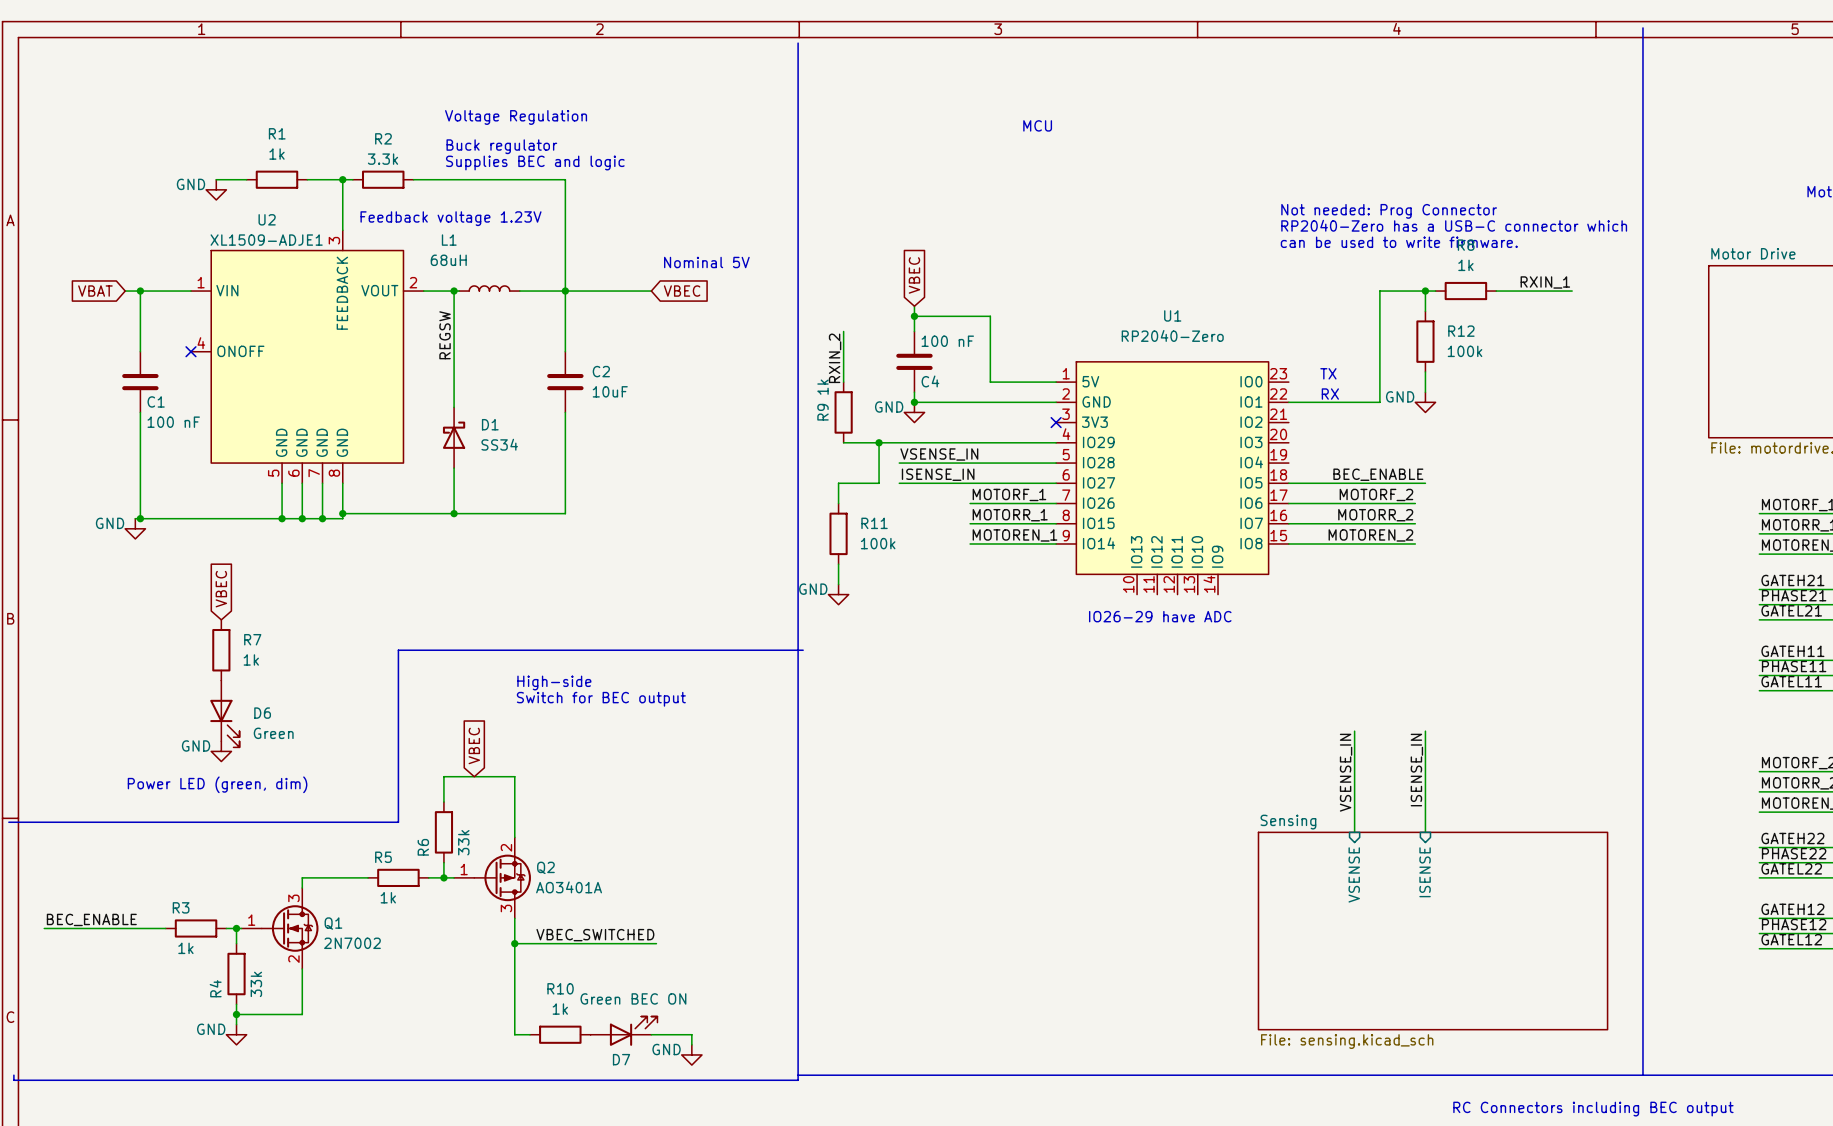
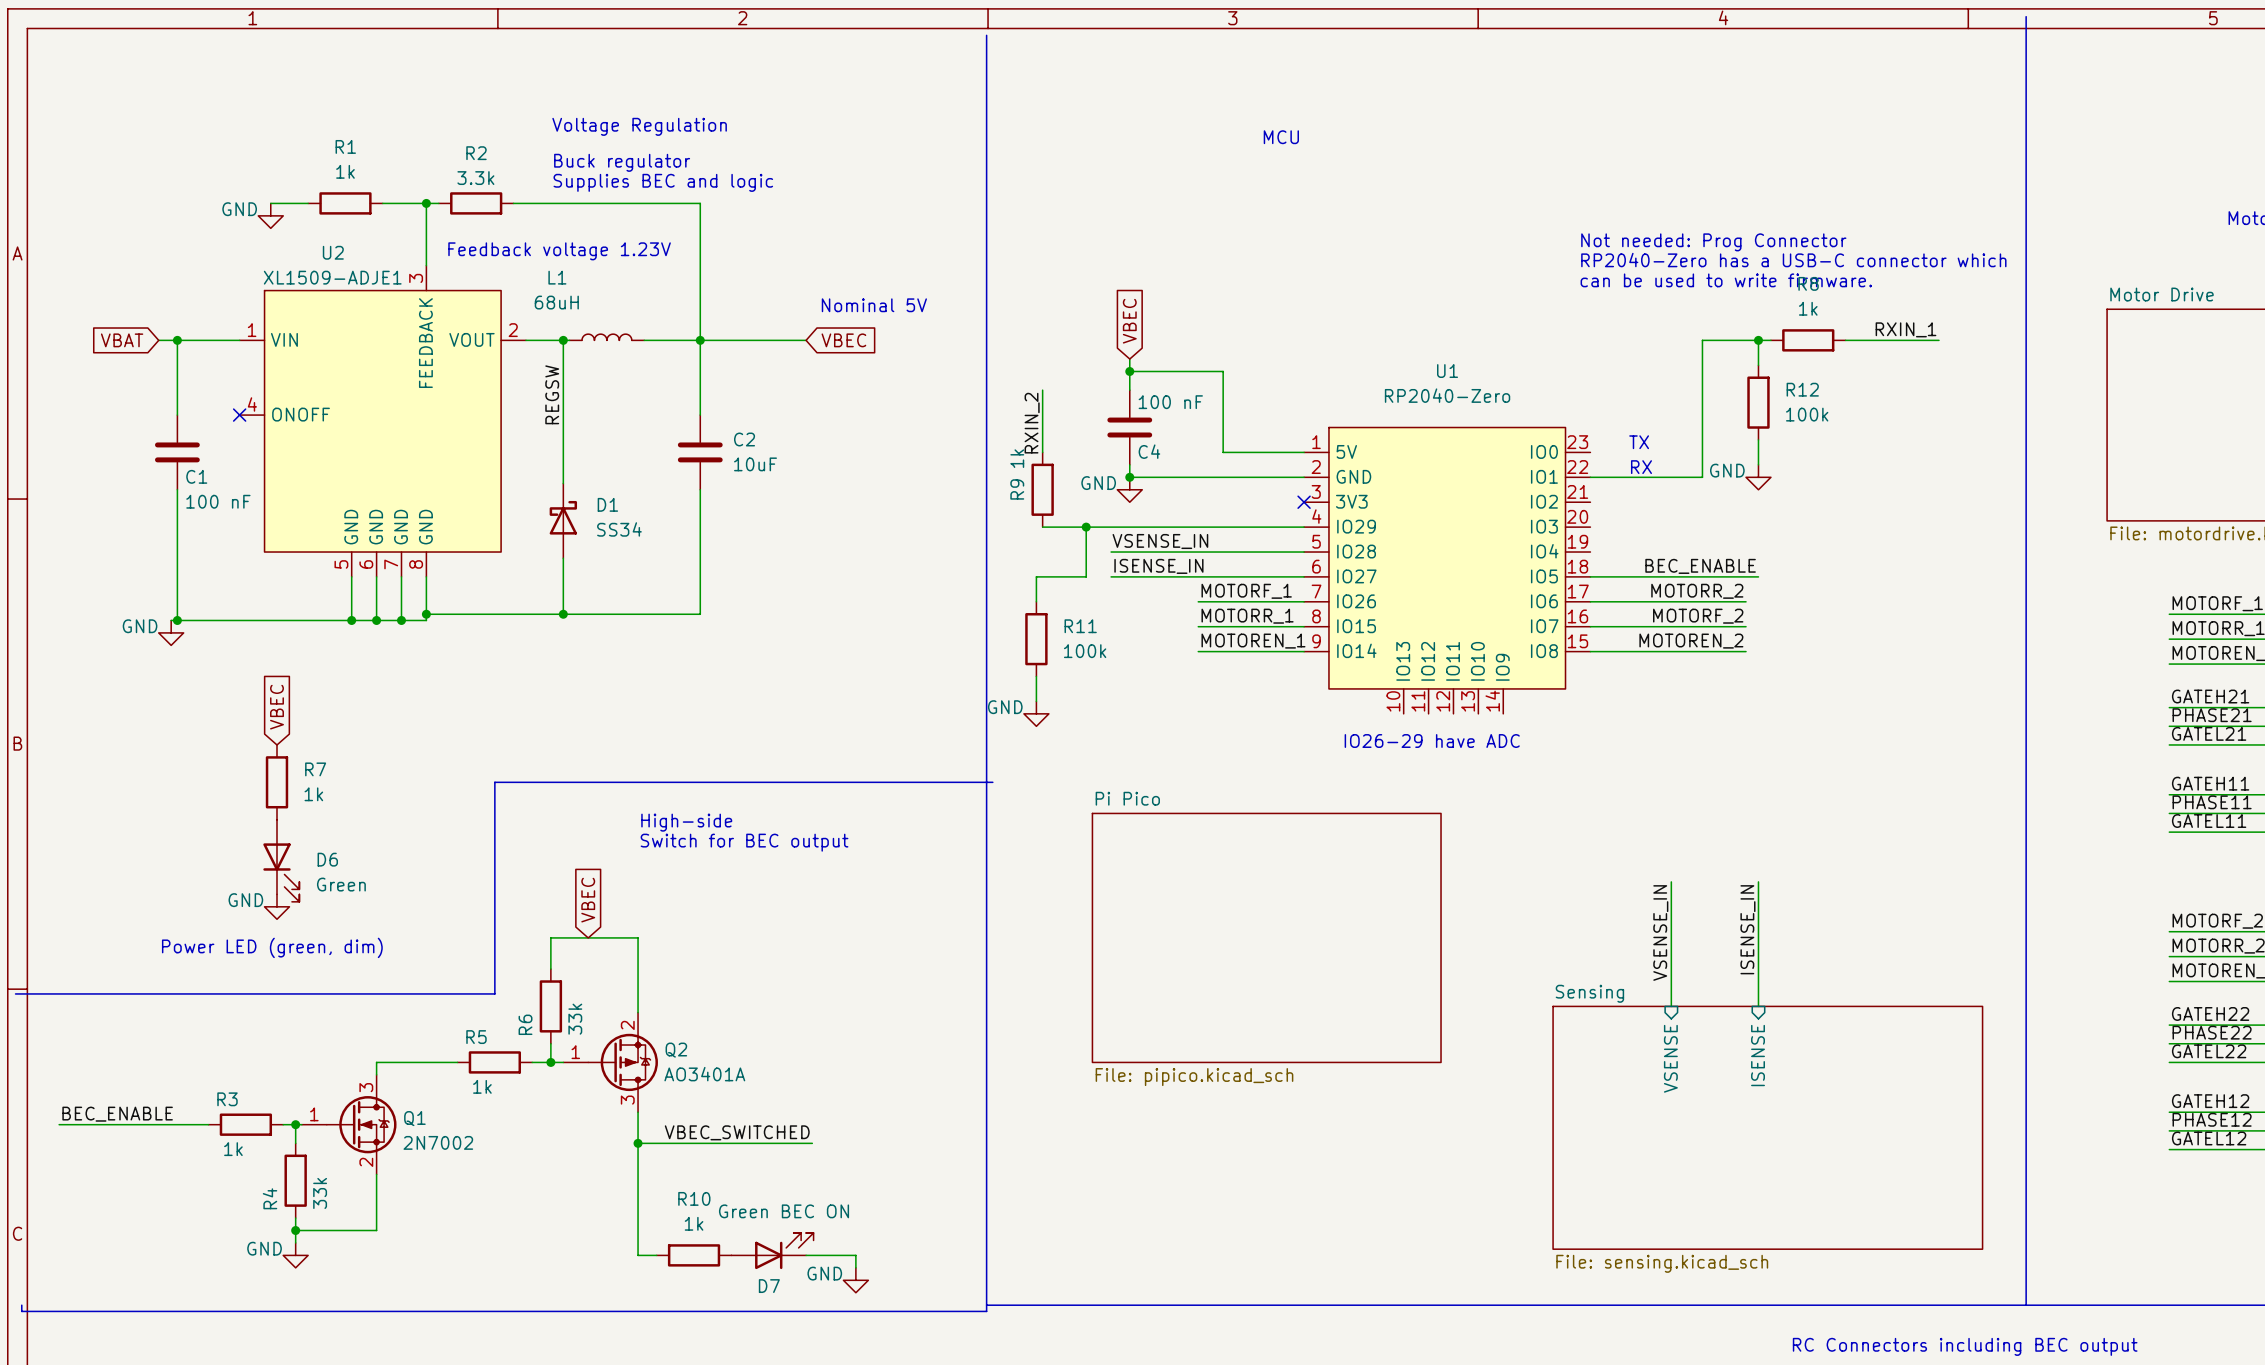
label: MOTORF_2 (1376, 494) -> MOTORR_2 (1697, 591)
label: MOTORR_2 (1375, 515) -> MOTORF_2 (1698, 616)
sheet Pi Pico: none -> File: pipico.kicad_sch (1266, 937)

